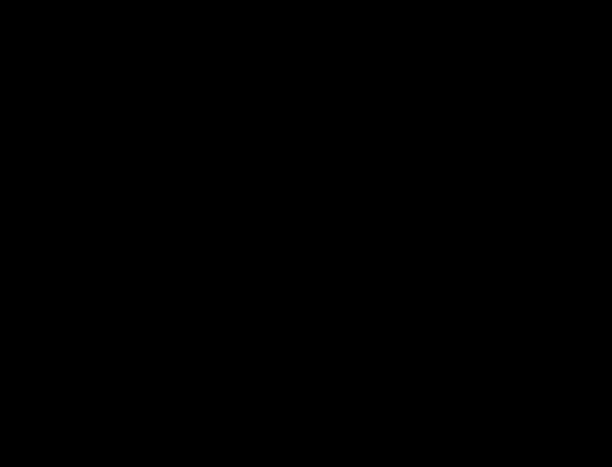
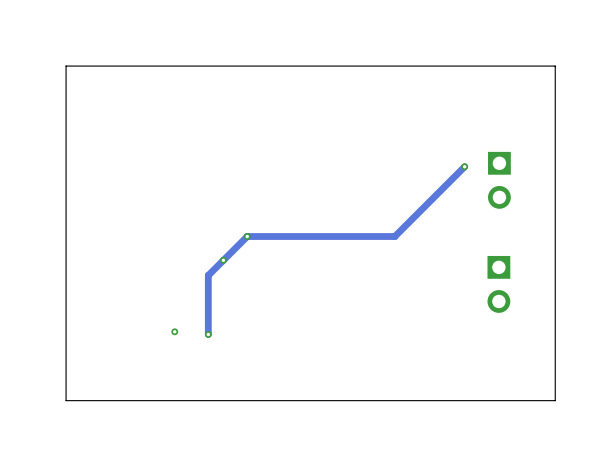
board edge: none -> (555, 66) (66, 66) (66, 400) (555, 400) (555, 66)
track: none -> (464, 166) (394, 236) (247, 236) (208, 275) (208, 334)
via: none -> (464, 166)
part: none -> (499, 180)
via: none -> (247, 236)
via: none -> (223, 260)
part: none -> (498, 284)
via: none -> (174, 331)
via: none -> (208, 334)

